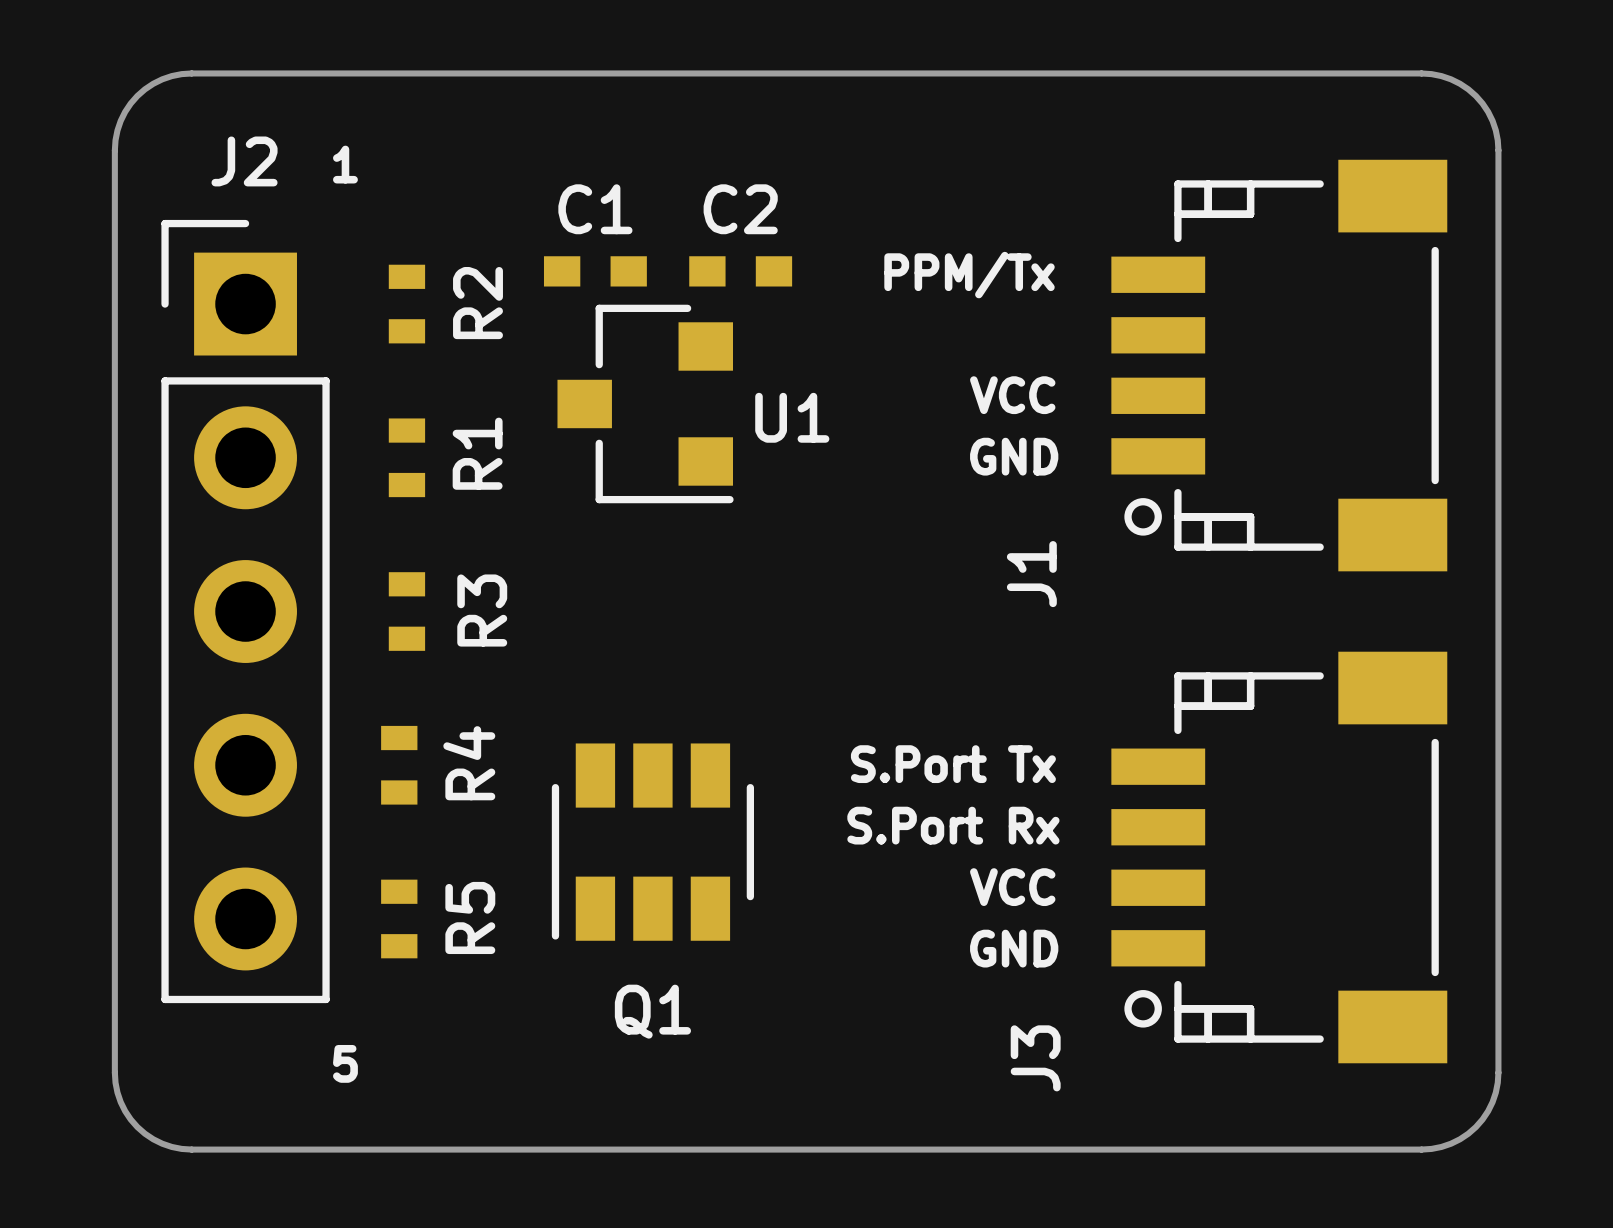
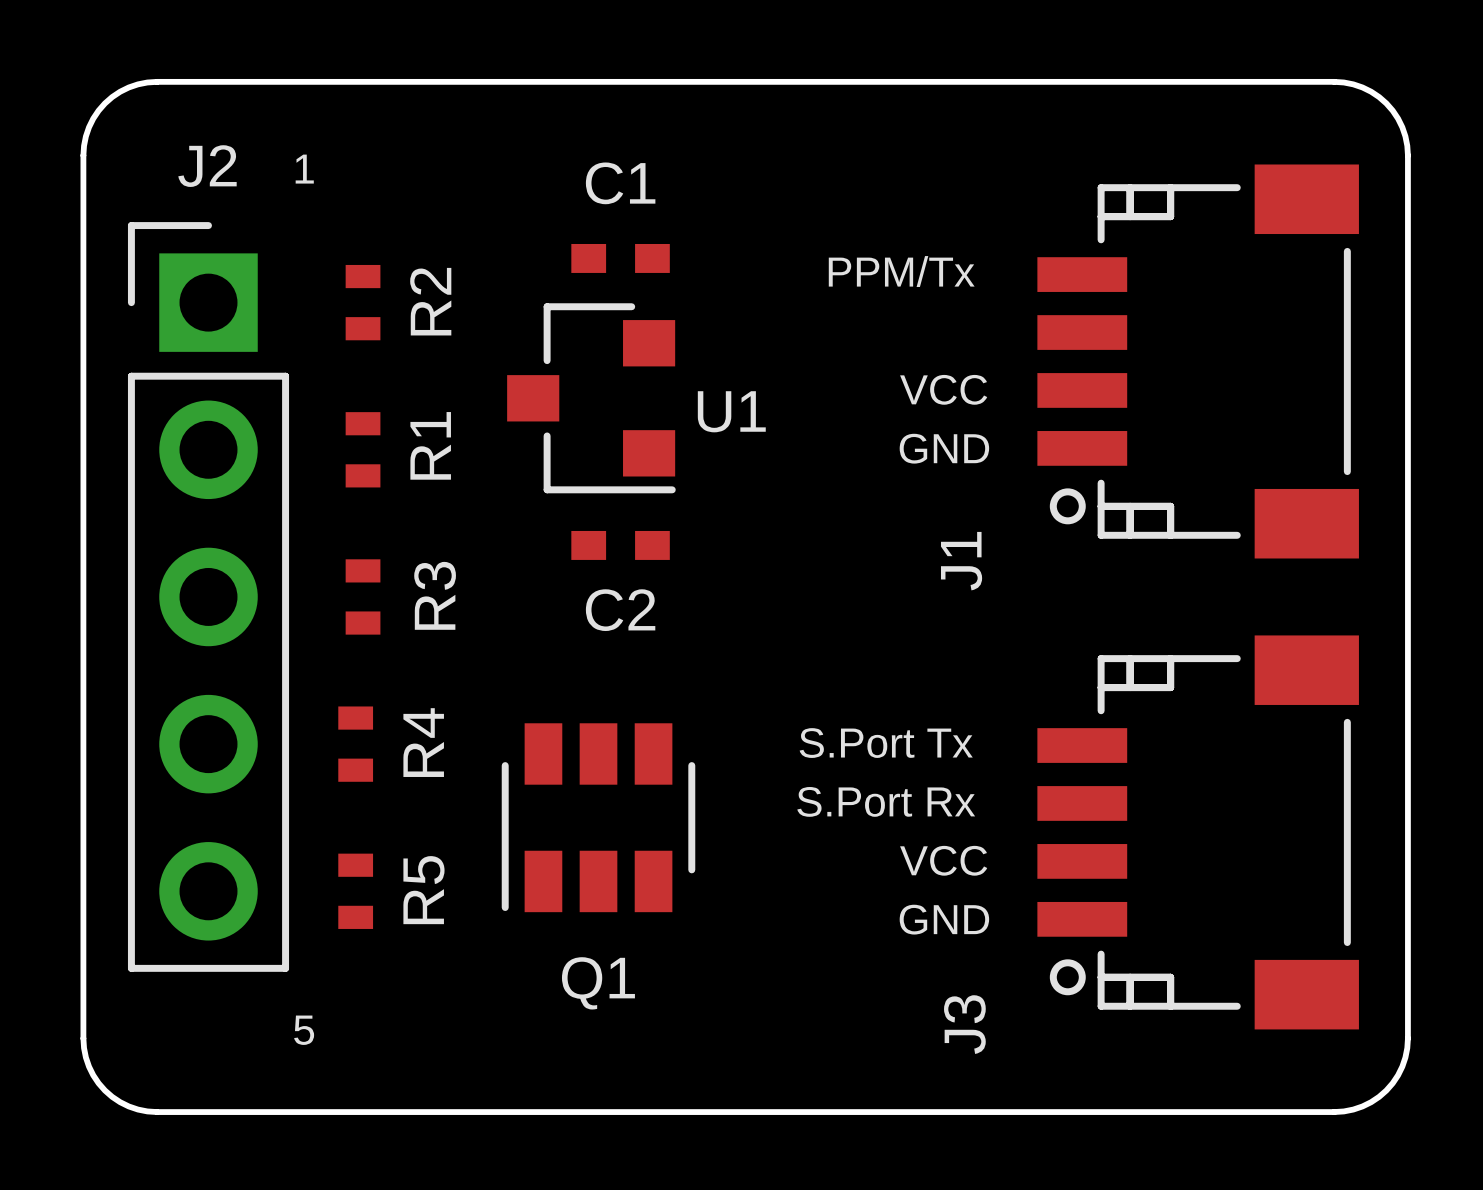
C1 name position: C1 (595, 209) -> C1 (620, 183)
C2 name position: C2 (740, 209) -> C2 (620, 610)
C1 position: (595, 271) -> (620, 258)
C2 position: (740, 271) -> (620, 545)

